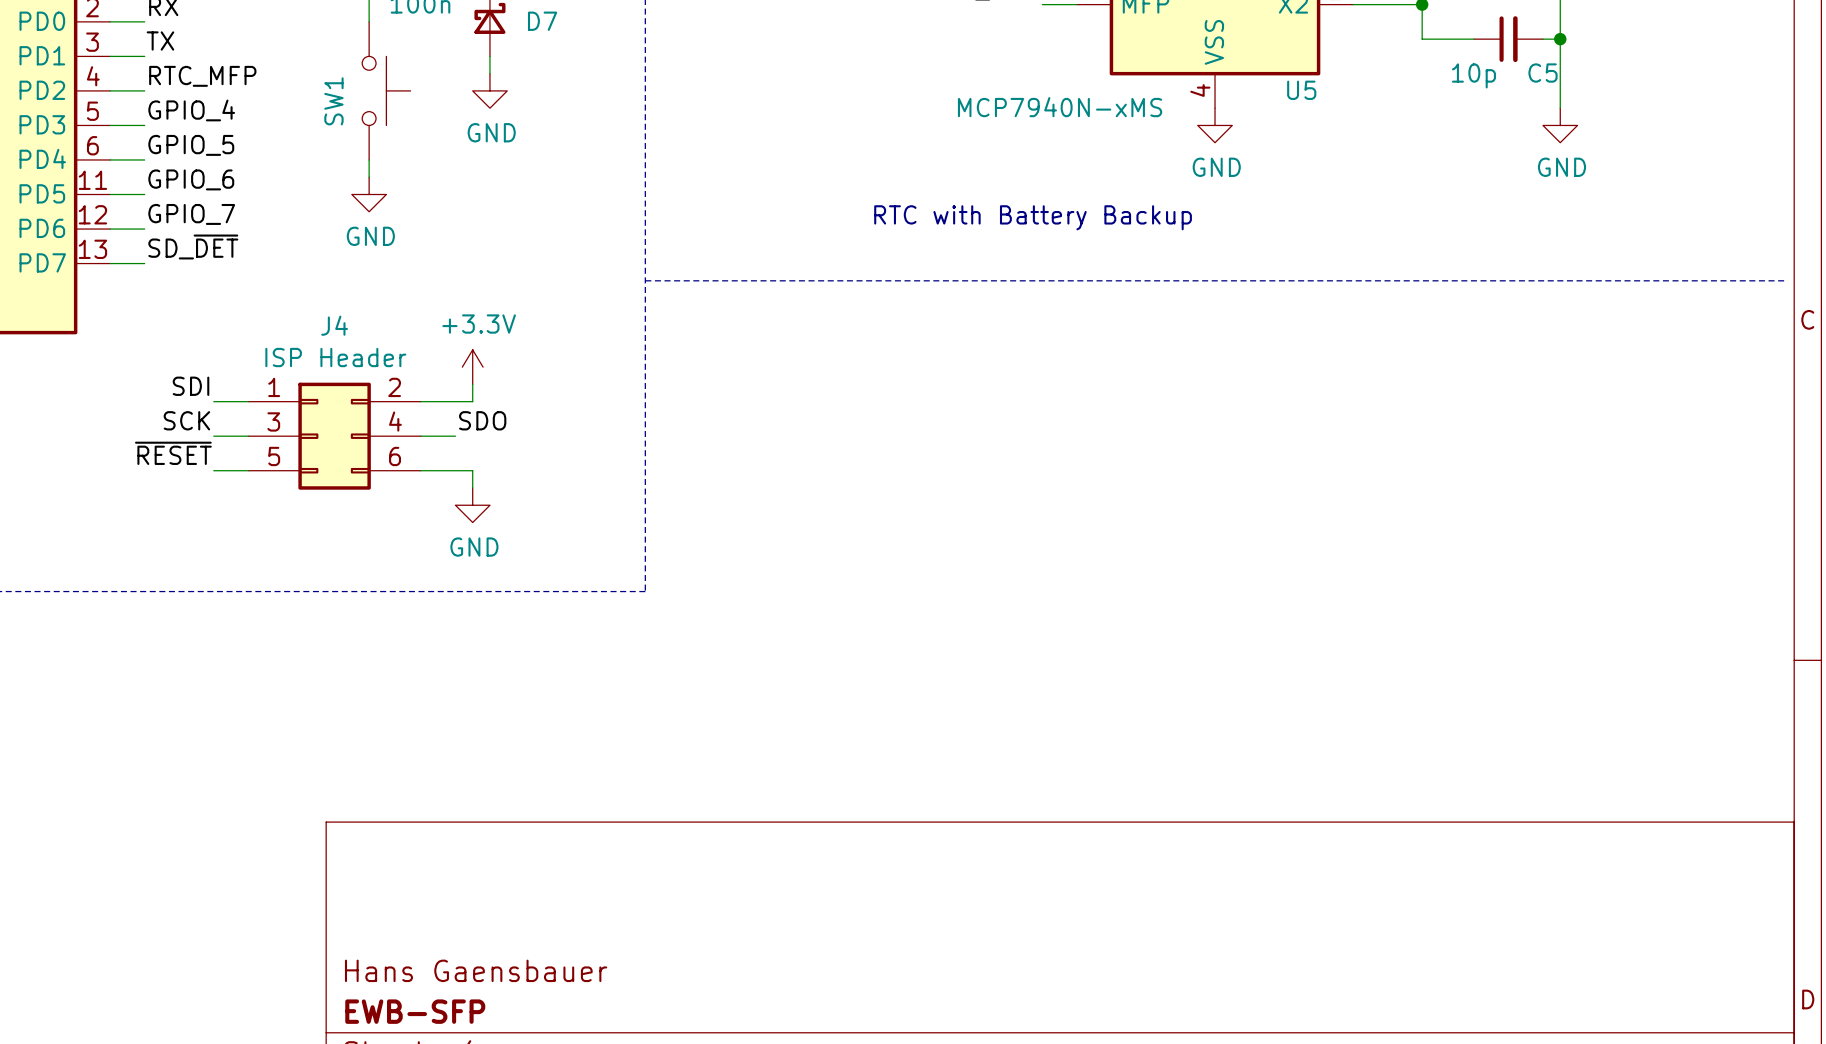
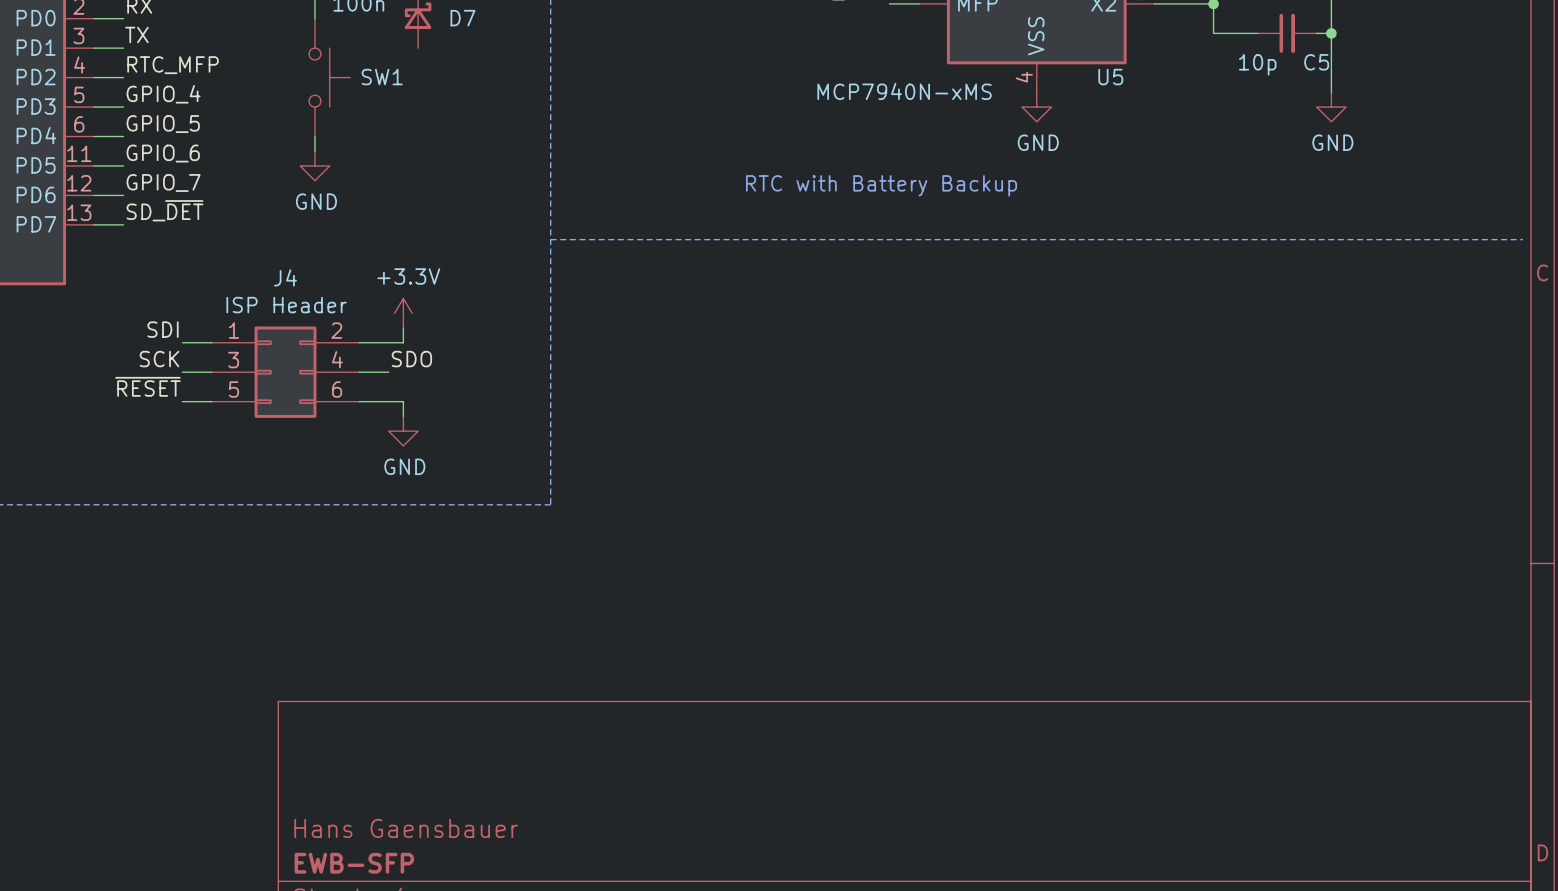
wire: (489, 56) (489, 73) -> none
power symbol: GND (489, 90) -> none
SW1 name rotation: 0° (333, 101) -> 90° clockwise (382, 77)
SW1 name position: SW1 (333, 101) -> SW1 (382, 77)

